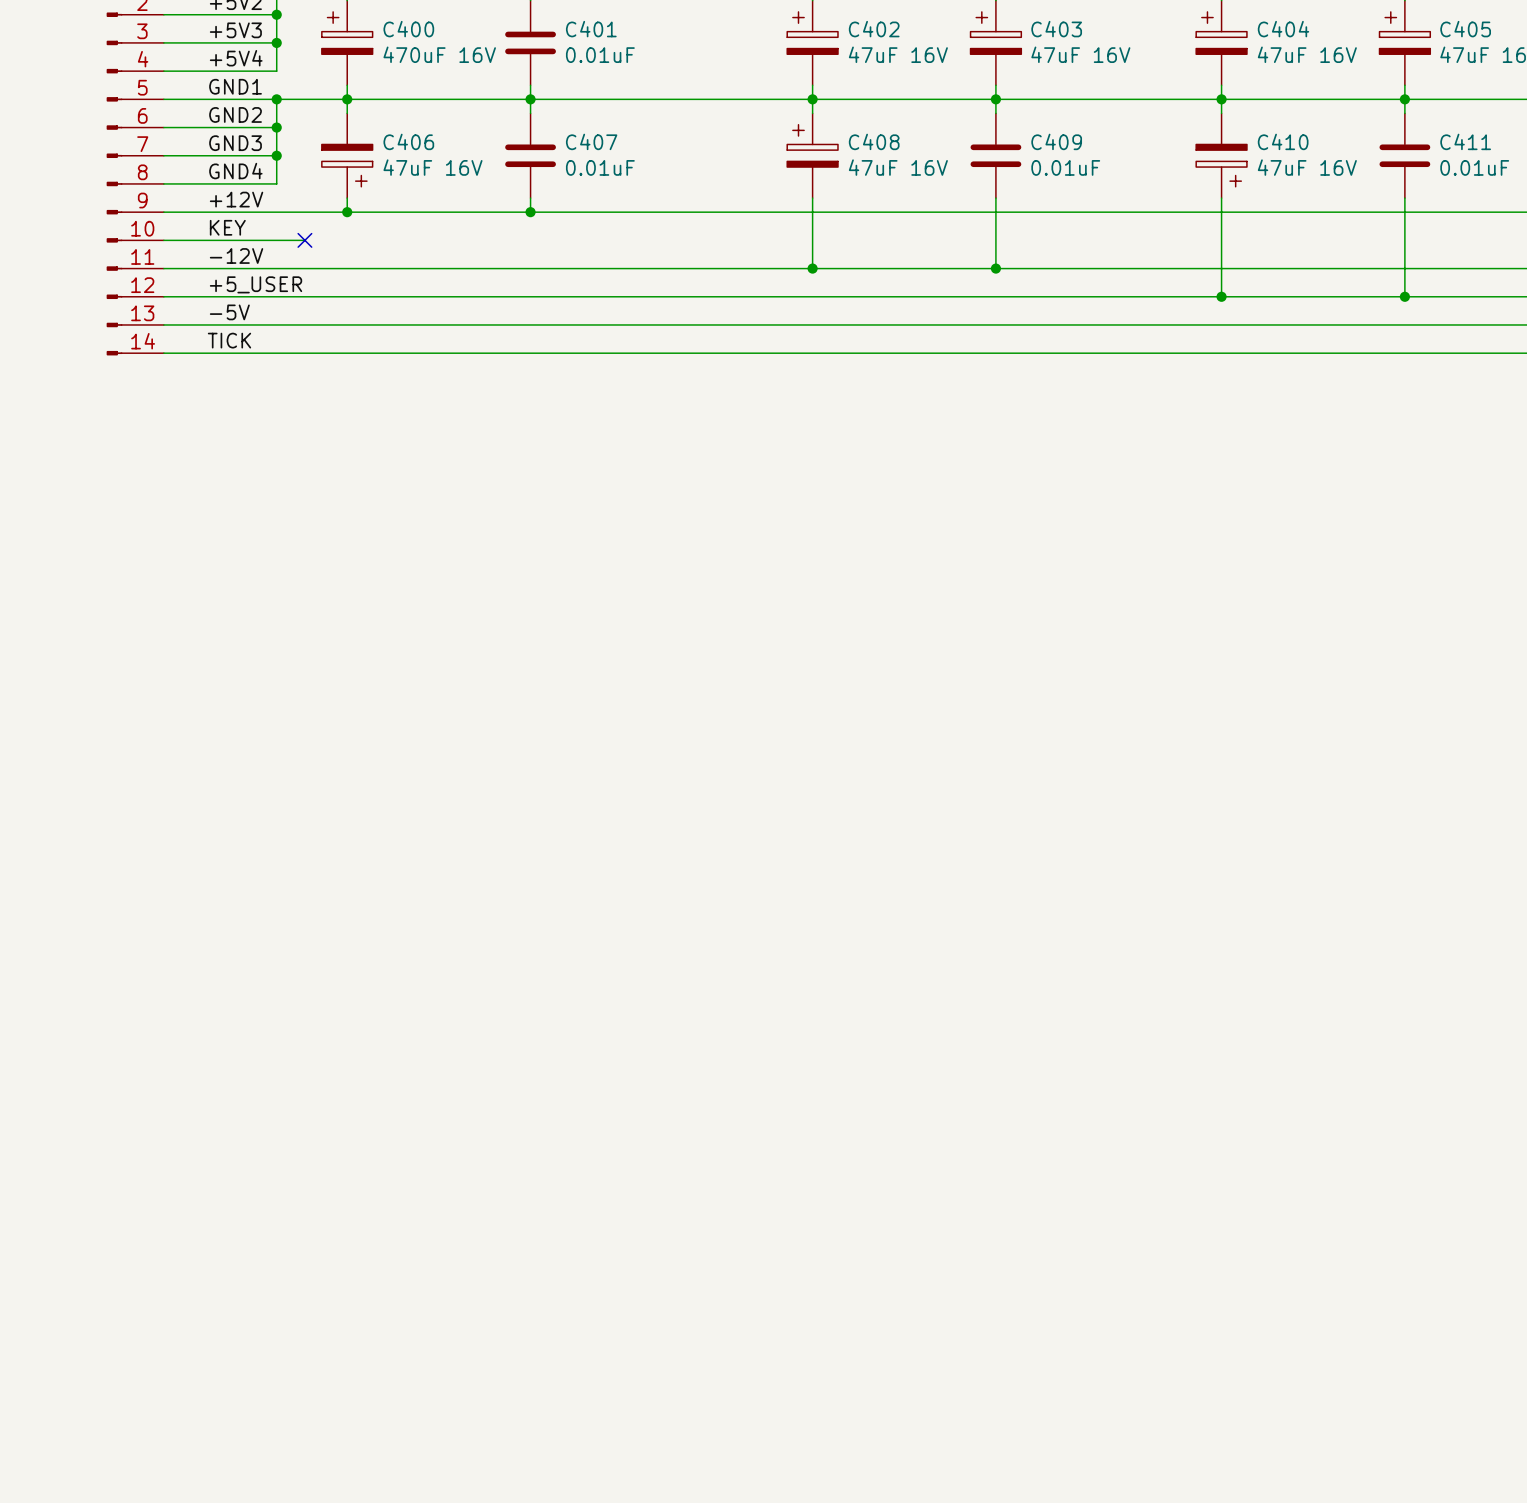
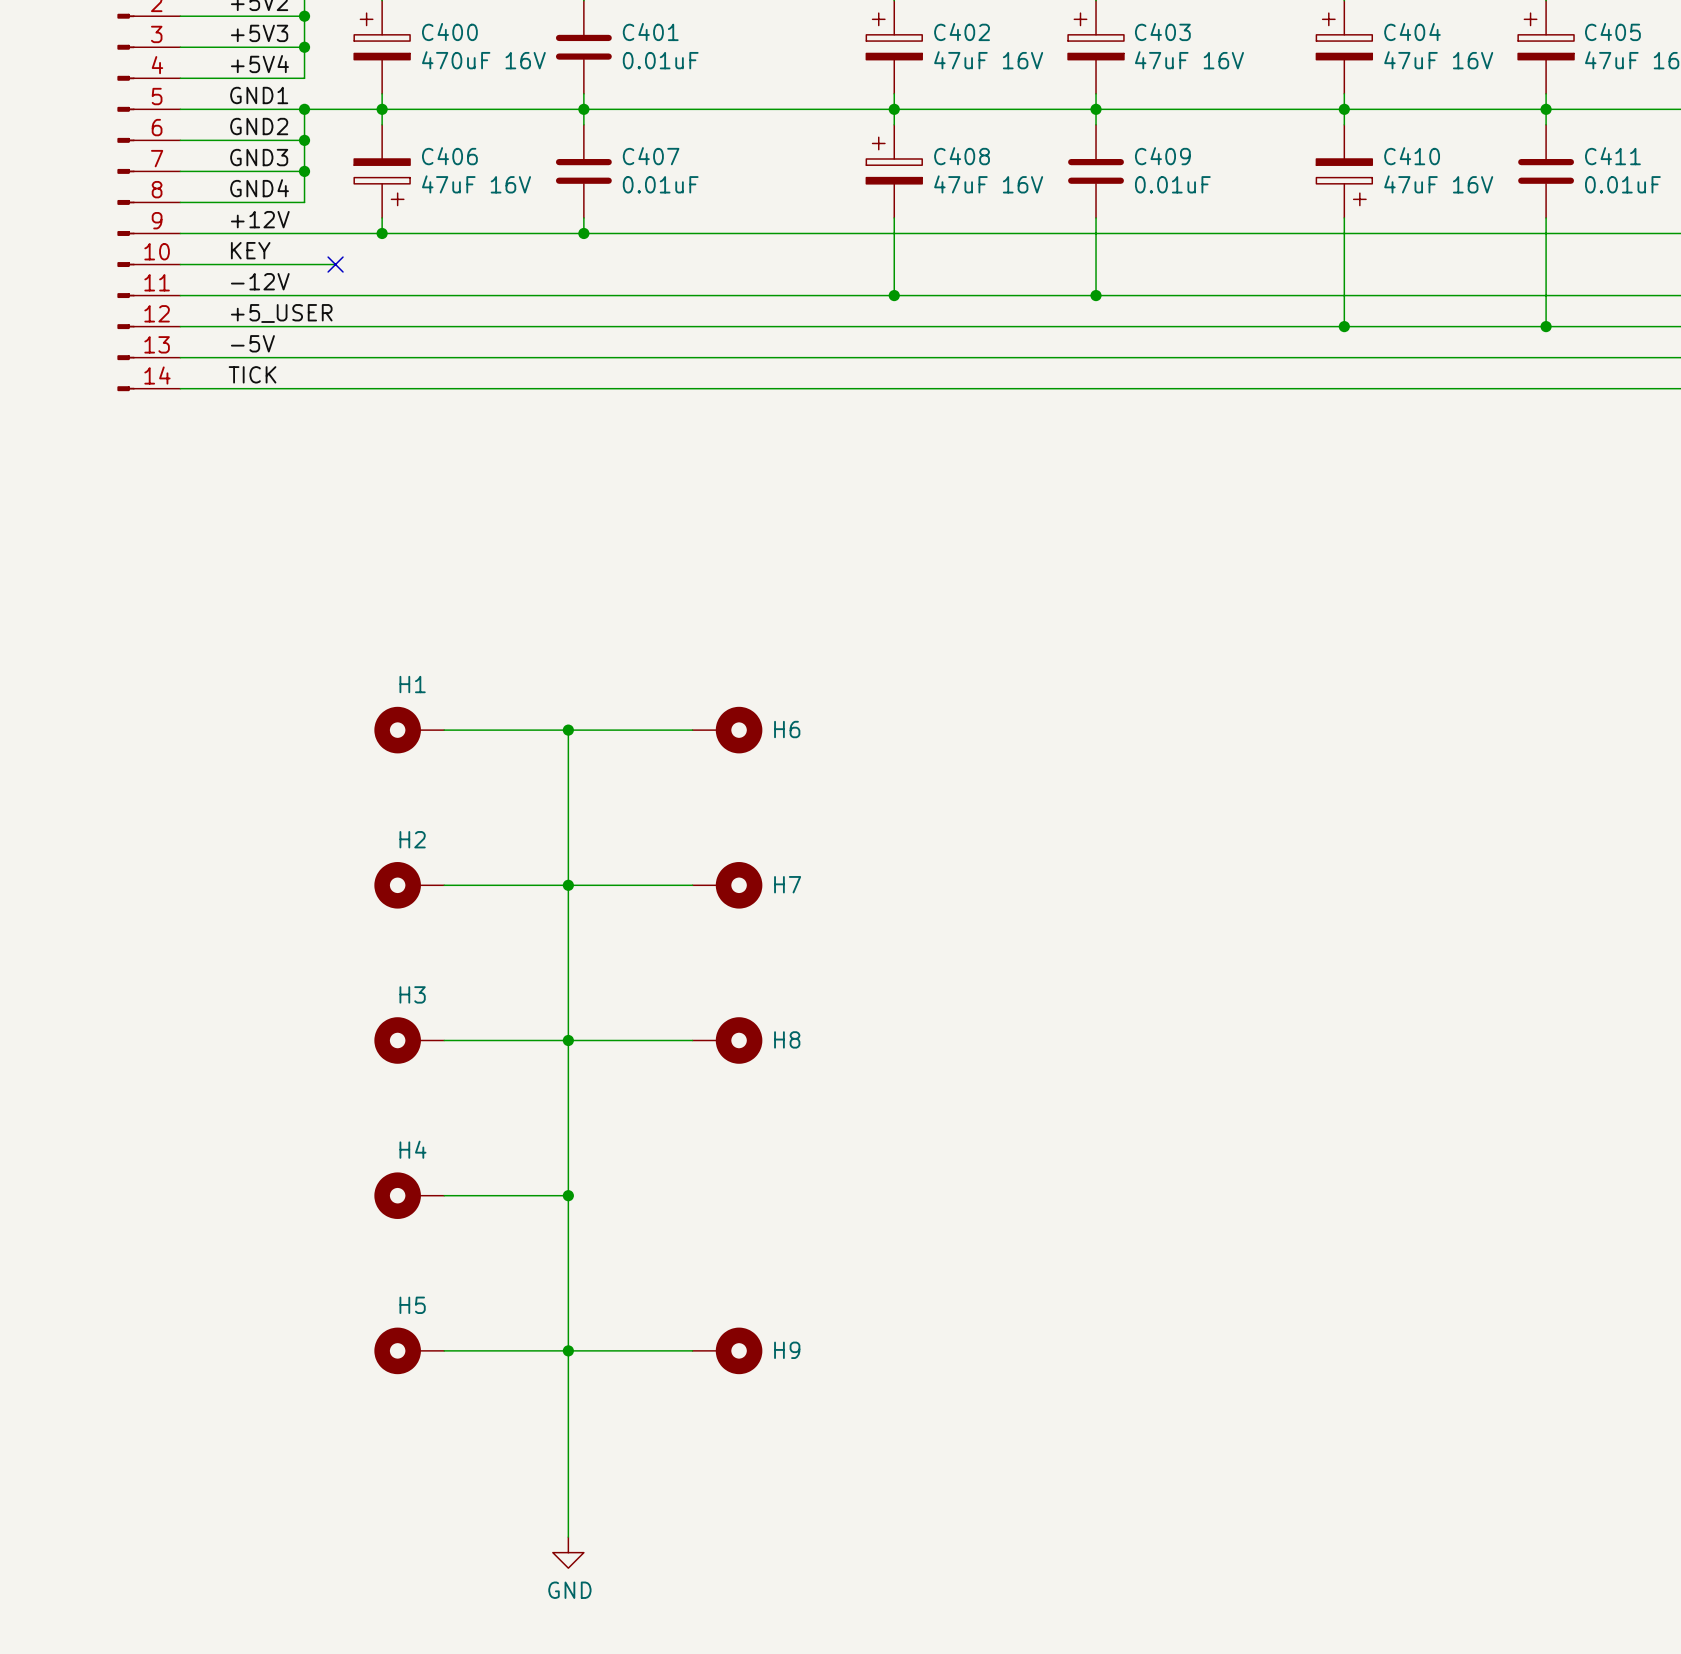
H1: none -> (409, 730)
wire: none -> (444, 730) (692, 730)
wire: none -> (568, 730) (568, 1537)
junction: none -> (568, 730)
H6: none -> (727, 730)
H2: none -> (409, 885)
wire: none -> (444, 885) (692, 885)
junction: none -> (568, 885)
H7: none -> (727, 885)
H3: none -> (409, 1040)
wire: none -> (444, 1040) (692, 1040)
junction: none -> (568, 1040)
H8: none -> (727, 1040)
H4: none -> (409, 1195)
wire: none -> (444, 1195) (568, 1195)
junction: none -> (568, 1195)
H5: none -> (409, 1350)
wire: none -> (444, 1350) (692, 1350)
junction: none -> (568, 1350)
H9: none -> (727, 1350)
power symbol: none -> GND (568, 1552)

